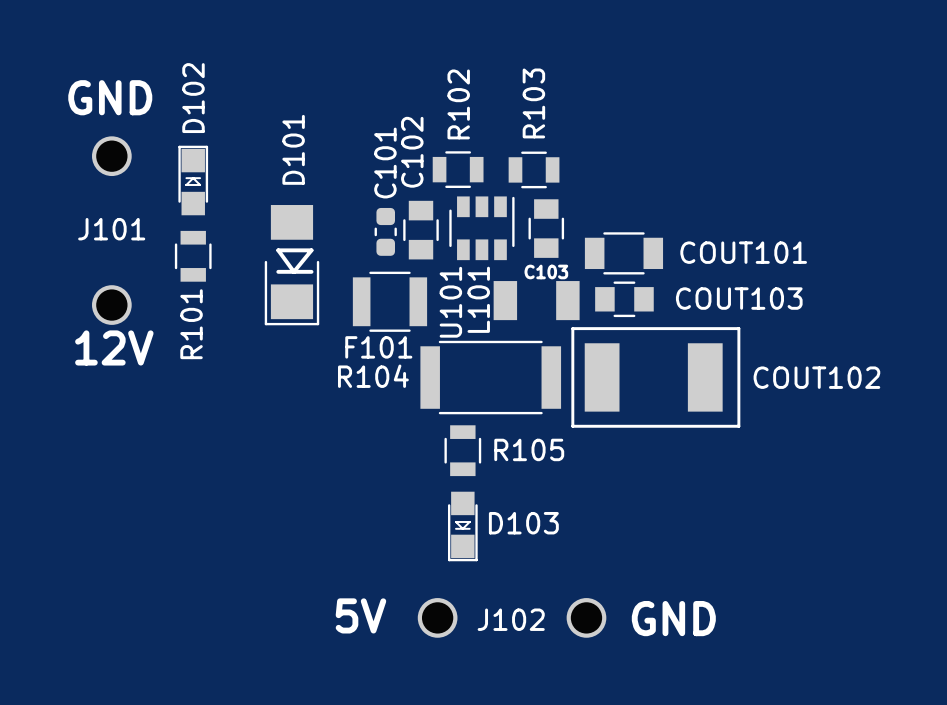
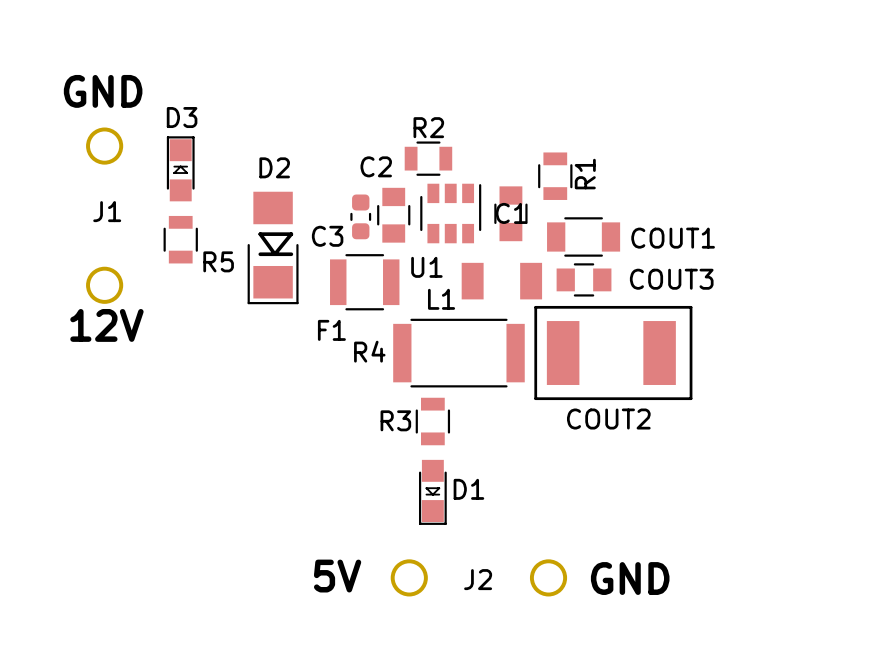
D102 name: D102 (193, 98) -> D3 (182, 117)
R102 name: R102 (458, 104) -> R2 (428, 127)
D101 name: D101 (293, 149) -> D2 (274, 167)
C102 name: C102 (412, 152) -> C2 (376, 166)
C101 name: C101 (385, 163) -> C3 (327, 236)
R103: (534, 169) -> none
R1: none -> (555, 176)
J101 name: J101 (111, 229) -> J1 (107, 211)
COUT101 name: COUT101 (743, 252) -> COUT1 (673, 238)
C103 name: C103 (546, 271) -> C1 (511, 213)
COUT103 name: COUT103 (739, 298) -> COUT3 (671, 279)
L101 name: L101 (478, 299) -> L1 (441, 299)
U101 name: U101 (450, 302) -> U1 (426, 267)
R101 name: R101 (191, 324) -> R5 (218, 261)
F101 name: F101 (378, 347) -> F1 (331, 330)
R104 name: R104 (373, 376) -> R4 (369, 351)
COUT102 name: COUT102 (816, 377) -> COUT2 (608, 419)
R105 name: R105 (529, 449) -> R3 (395, 420)
D103 name: D103 (523, 523) -> D1 (468, 489)
J102 name: J102 (511, 619) -> J2 (478, 579)

